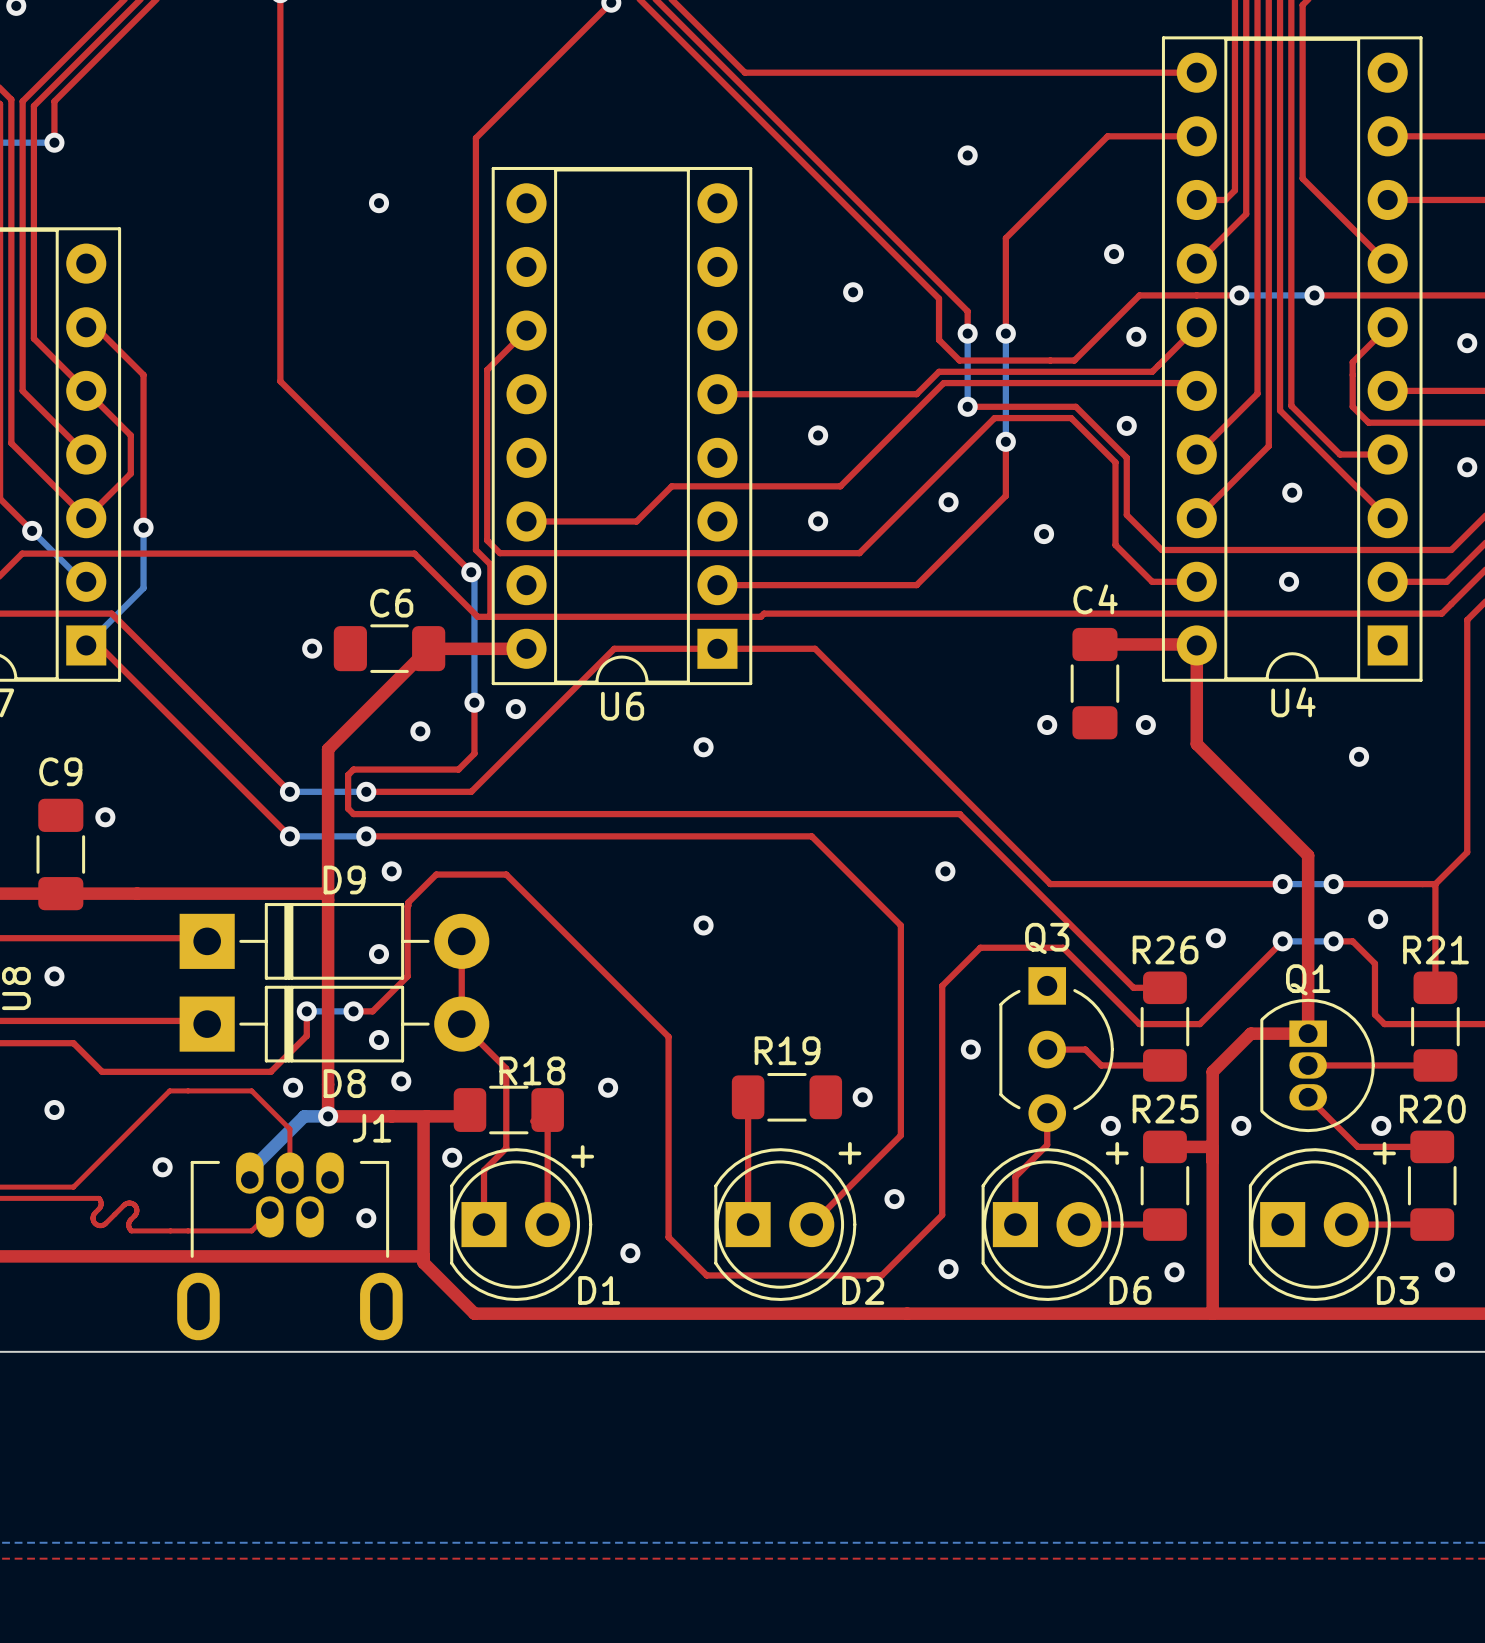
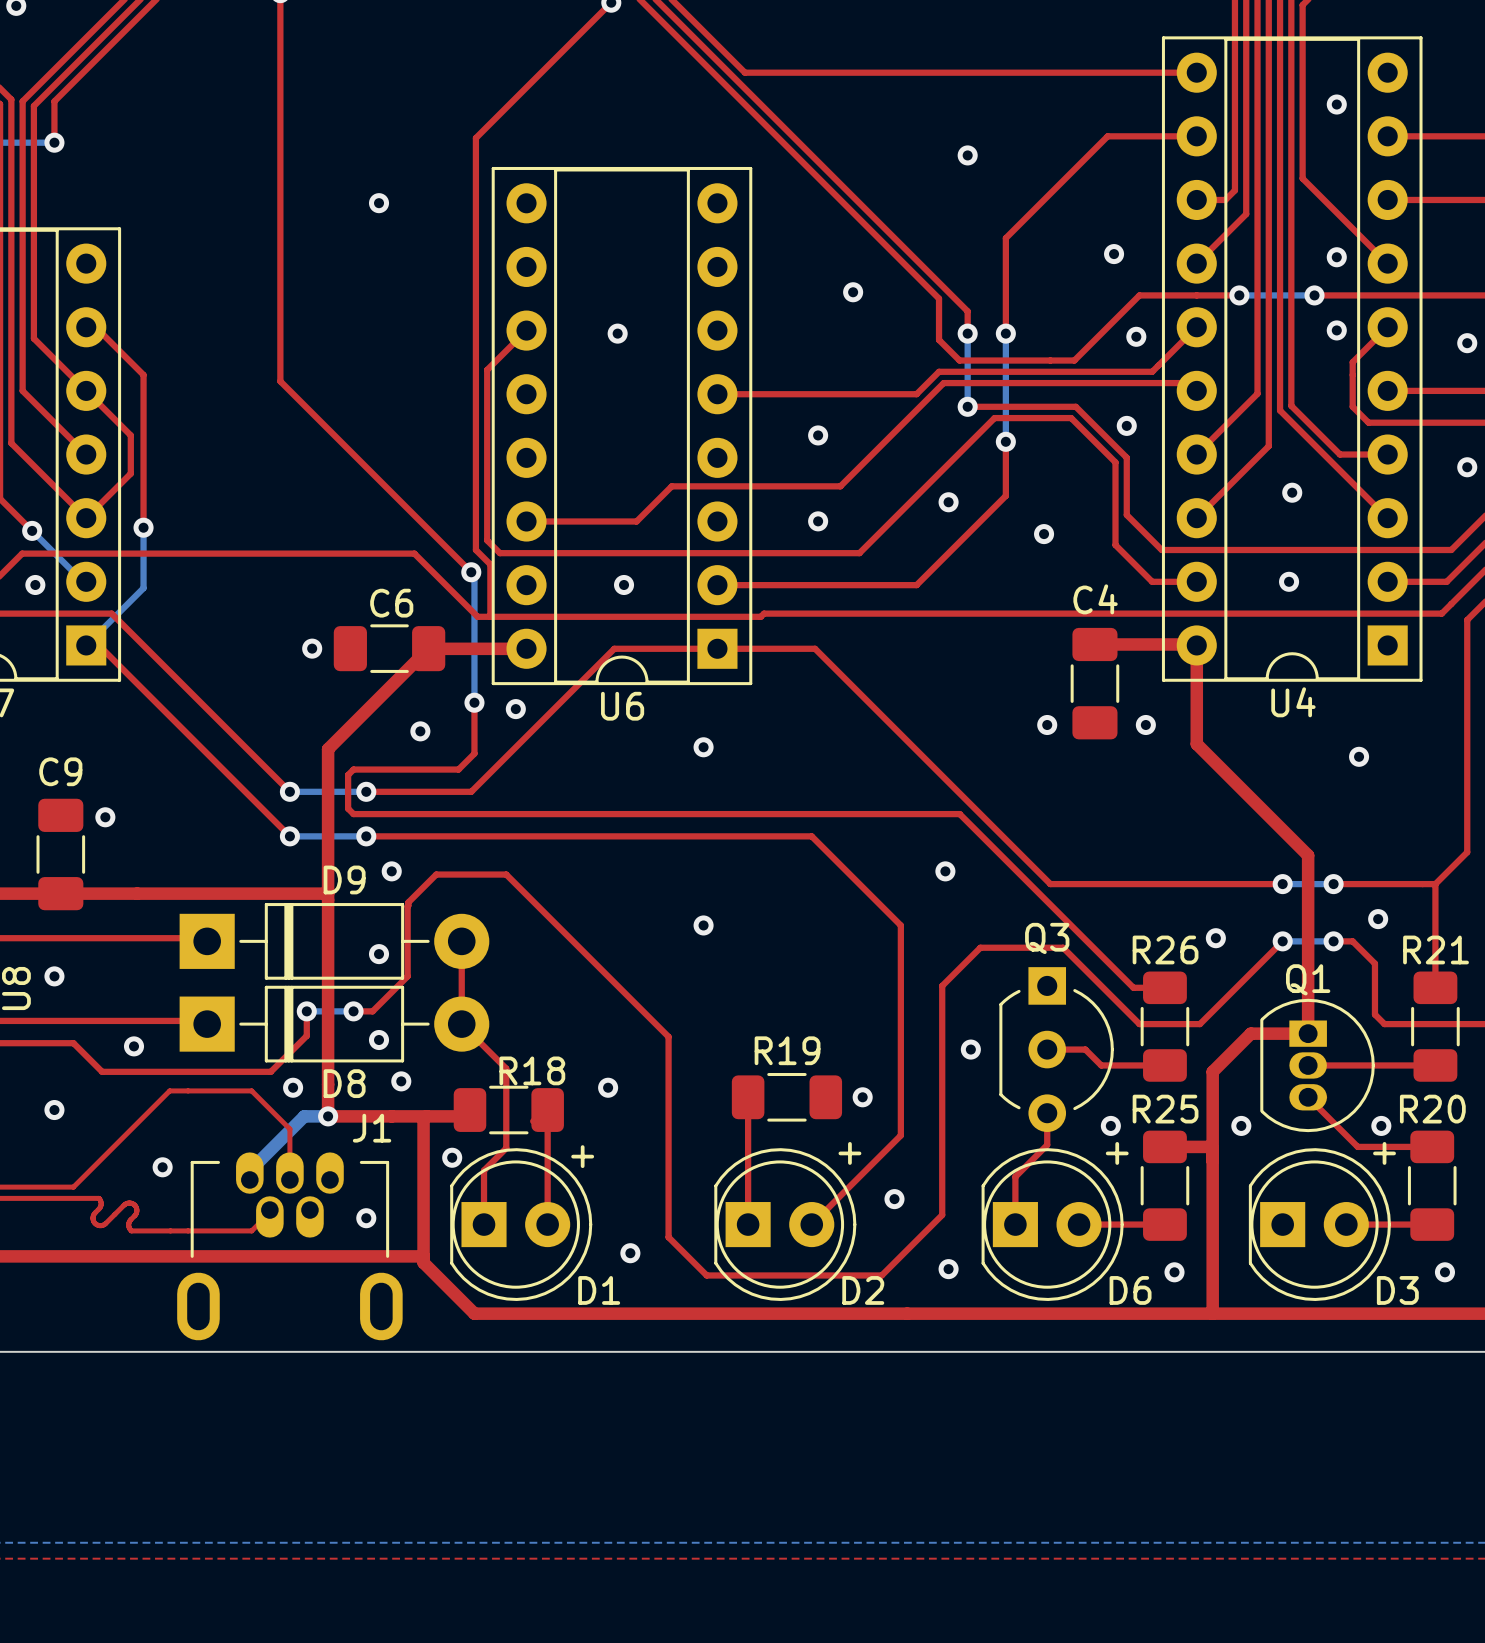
via: none -> (1336, 104)
via: none -> (1336, 257)
via: none -> (1336, 330)
via: none -> (617, 333)
via: none -> (35, 584)
via: none -> (624, 584)
via: none -> (134, 1046)

